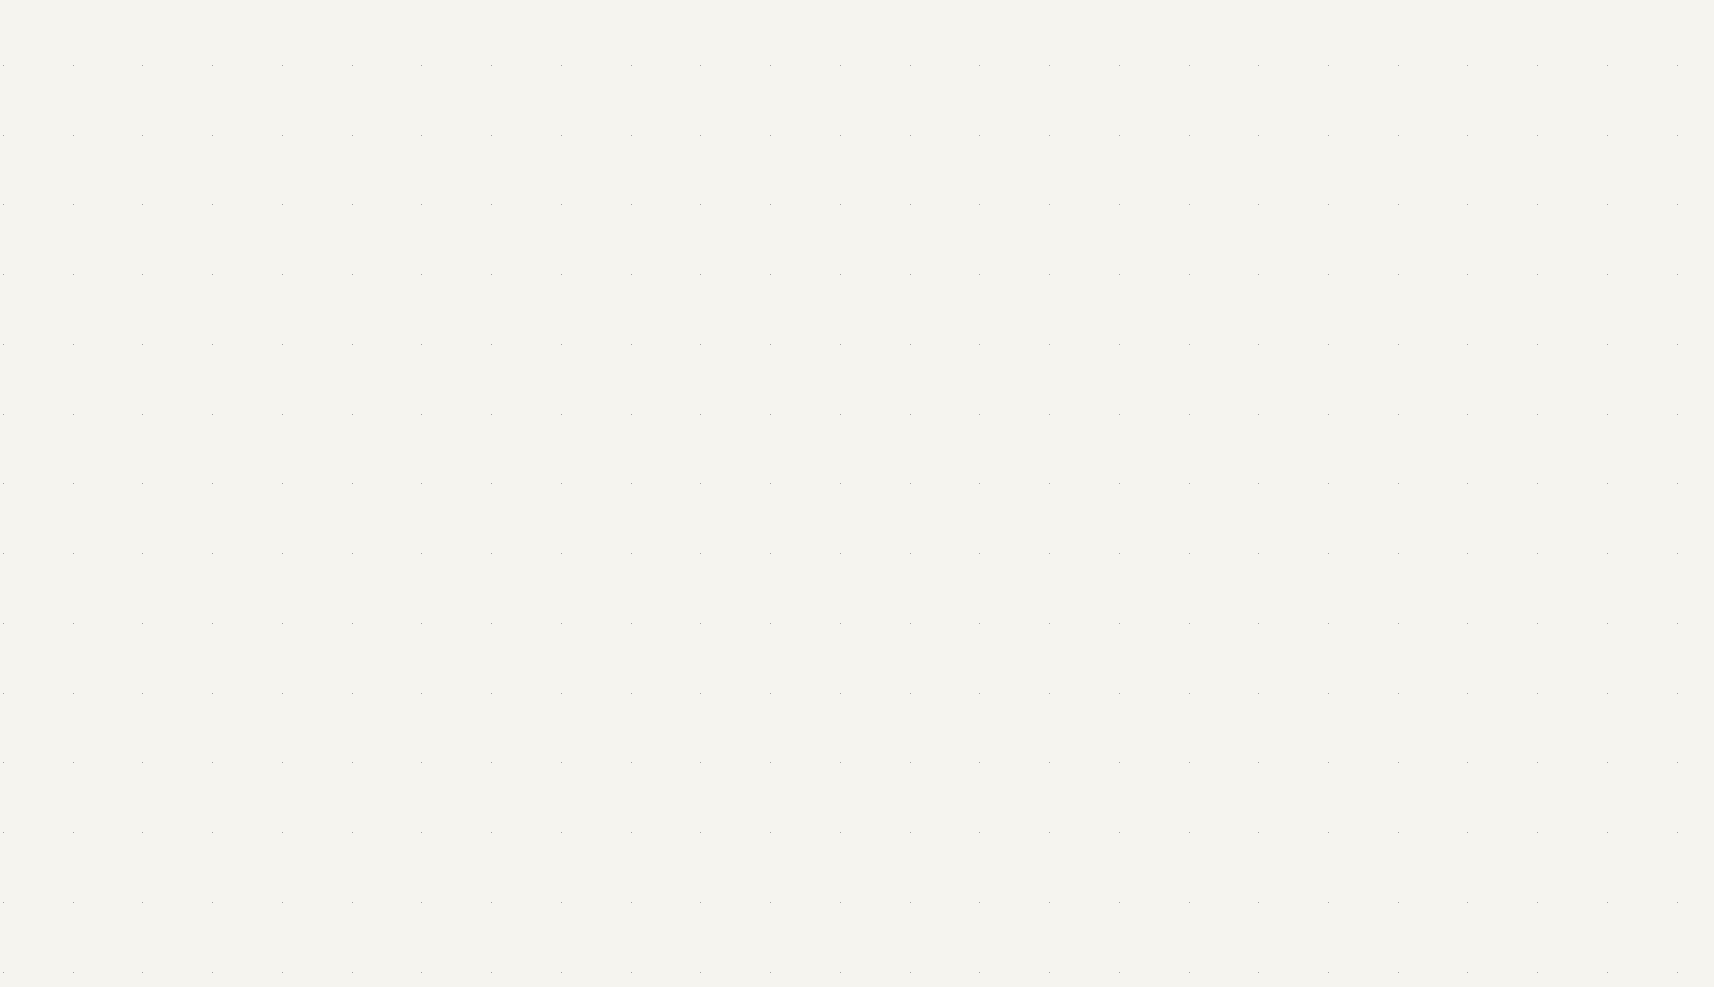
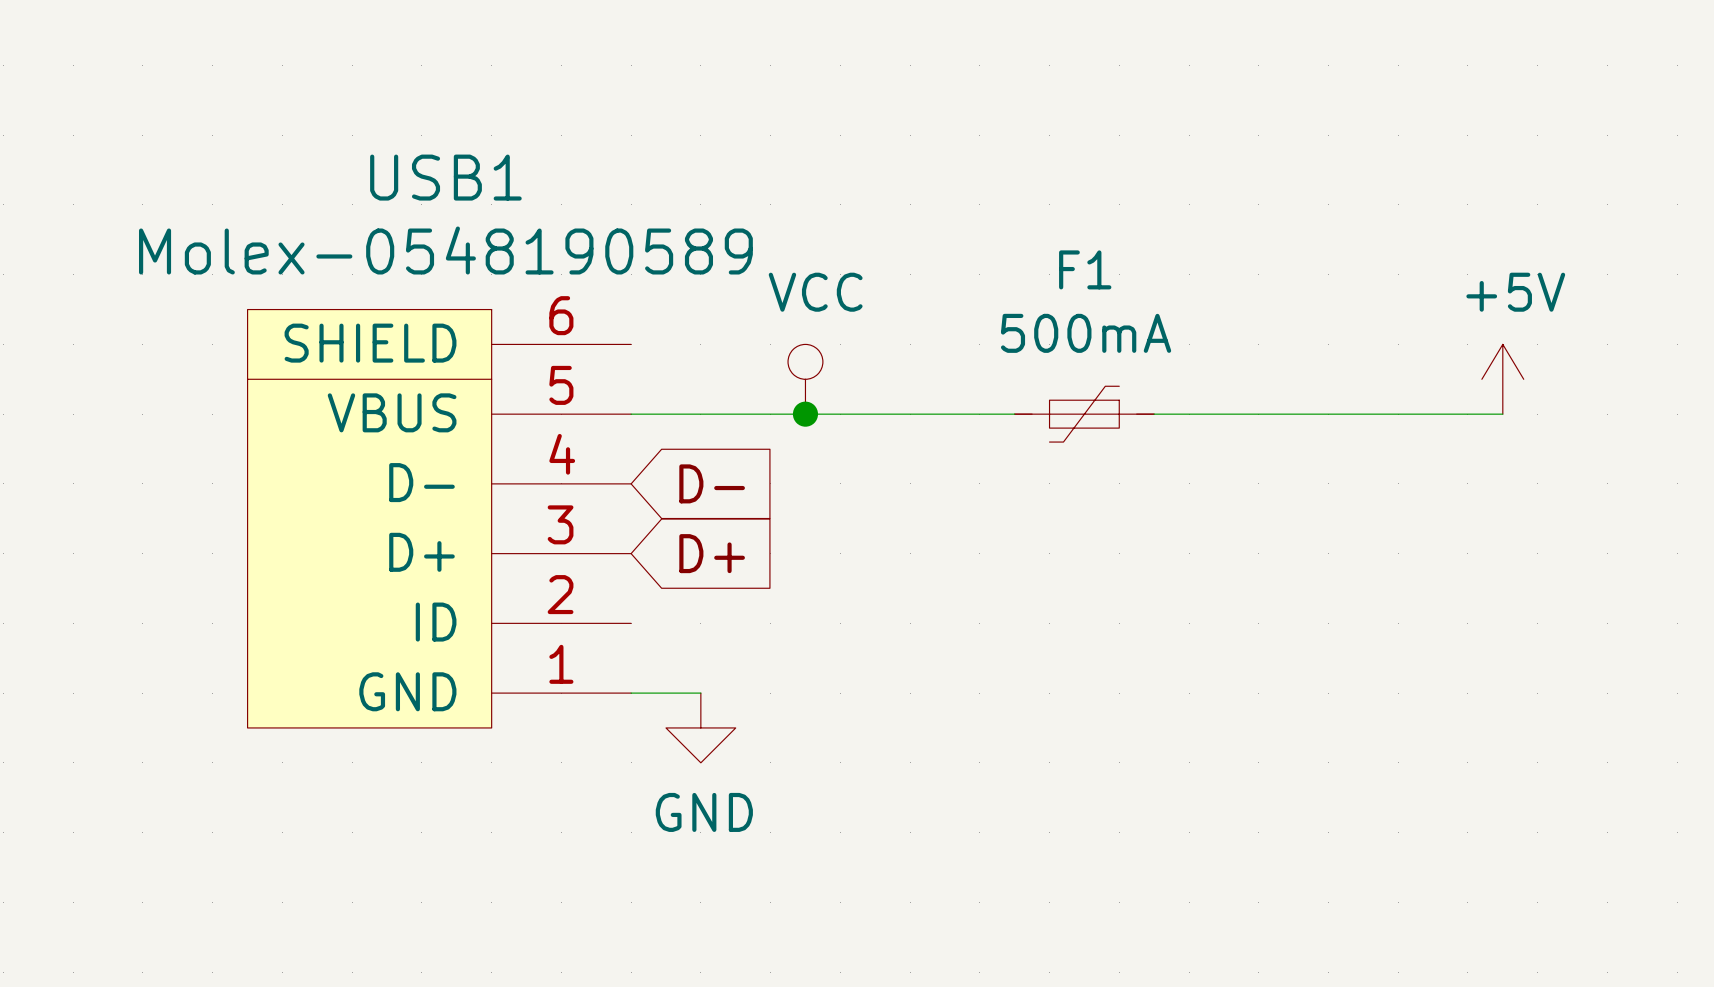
power symbol: none -> VCC (805, 379)
power symbol: none -> +5V (1502, 379)
wire: none -> (631, 414) (1014, 414)
junction: none -> (805, 414)
F1: none -> 500mA (1084, 414)
wire: none -> (1154, 414) (1502, 414)
global label: none -> D- (712, 483)
USB1: none -> Molex-0548190589 (439, 518)
global label: none -> D+ (712, 553)
wire: none -> (631, 693) (700, 693)
power symbol: none -> GND (700, 727)

